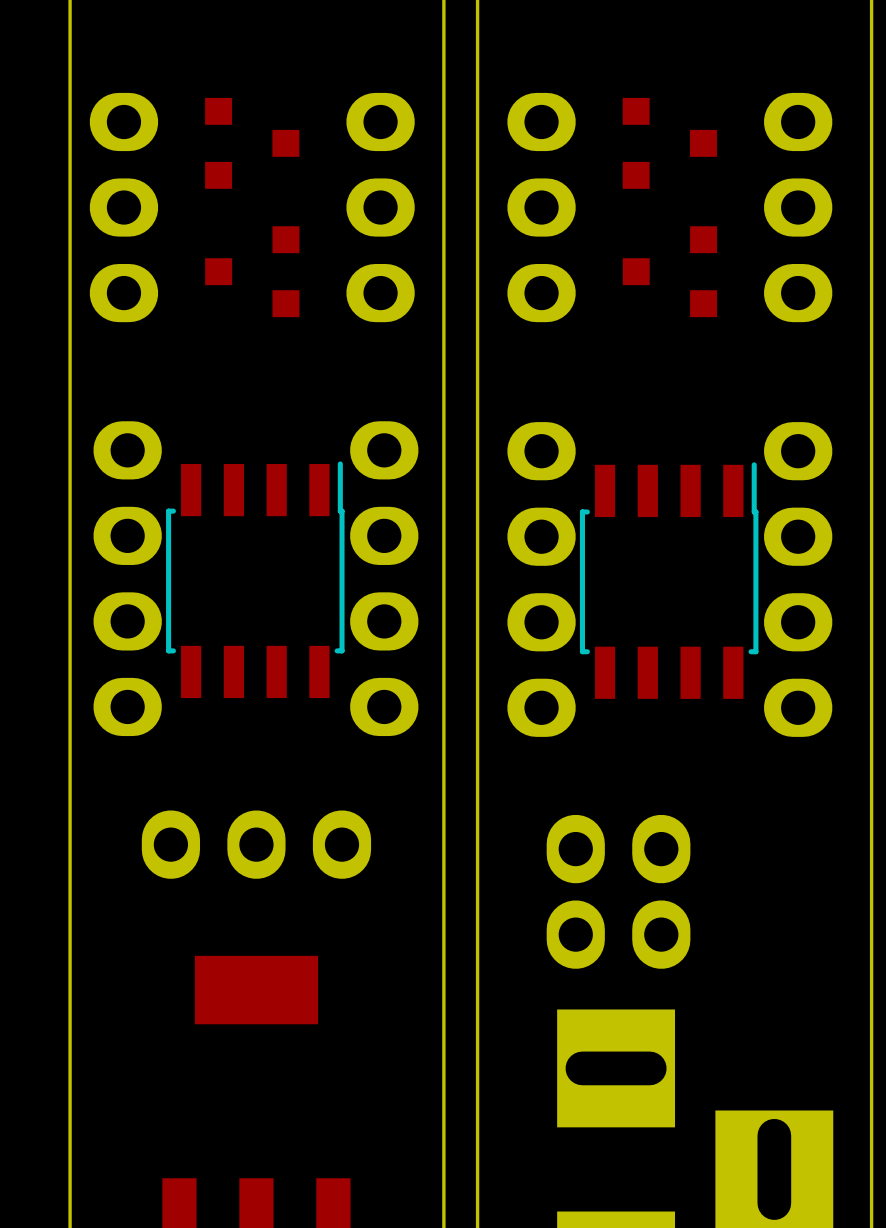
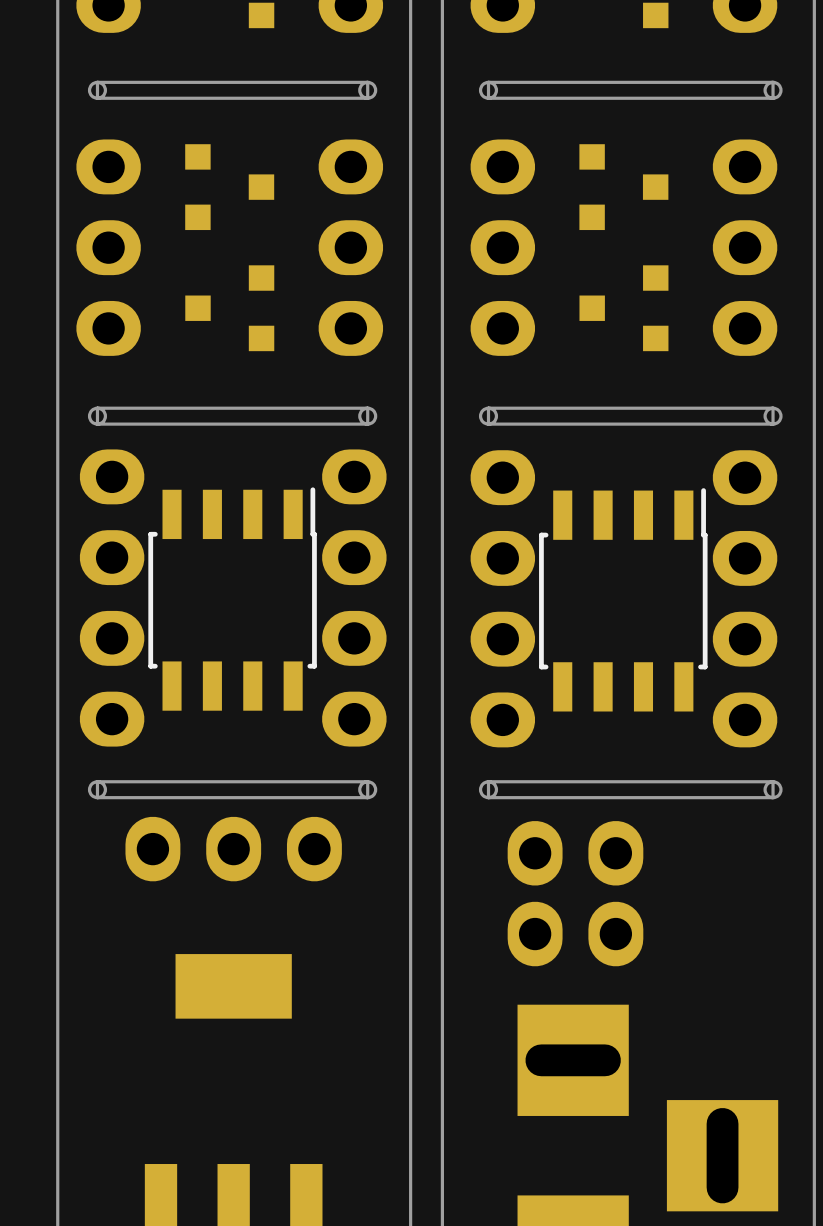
round board edge: none -> [87, 80, 108, 100]
round board edge: none -> [358, 80, 378, 100]
round board edge: none -> [478, 80, 499, 100]
round board edge: none -> [763, 80, 783, 100]
board edge: none -> (97, 82) (367, 82) (367, 98) (97, 98) (97, 82)
board edge: none -> (488, 82) (488, 98) (773, 98) (773, 82) (488, 82)
round board edge: none -> [87, 406, 108, 426]
round board edge: none -> [358, 406, 378, 426]
round board edge: none -> [478, 406, 499, 426]
round board edge: none -> [763, 406, 783, 426]
board edge: none -> (97, 408) (97, 424) (367, 424) (367, 408) (97, 408)
board edge: none -> (488, 408) (488, 424) (773, 424) (773, 408) (488, 408)
round board edge: none -> [87, 780, 108, 800]
round board edge: none -> [358, 780, 378, 800]
round board edge: none -> [478, 780, 499, 800]
round board edge: none -> [763, 780, 783, 800]
board edge: none -> (97, 781) (97, 797) (367, 797) (367, 781) (97, 781)
board edge: none -> (488, 781) (488, 797) (773, 797) (773, 781) (488, 781)

